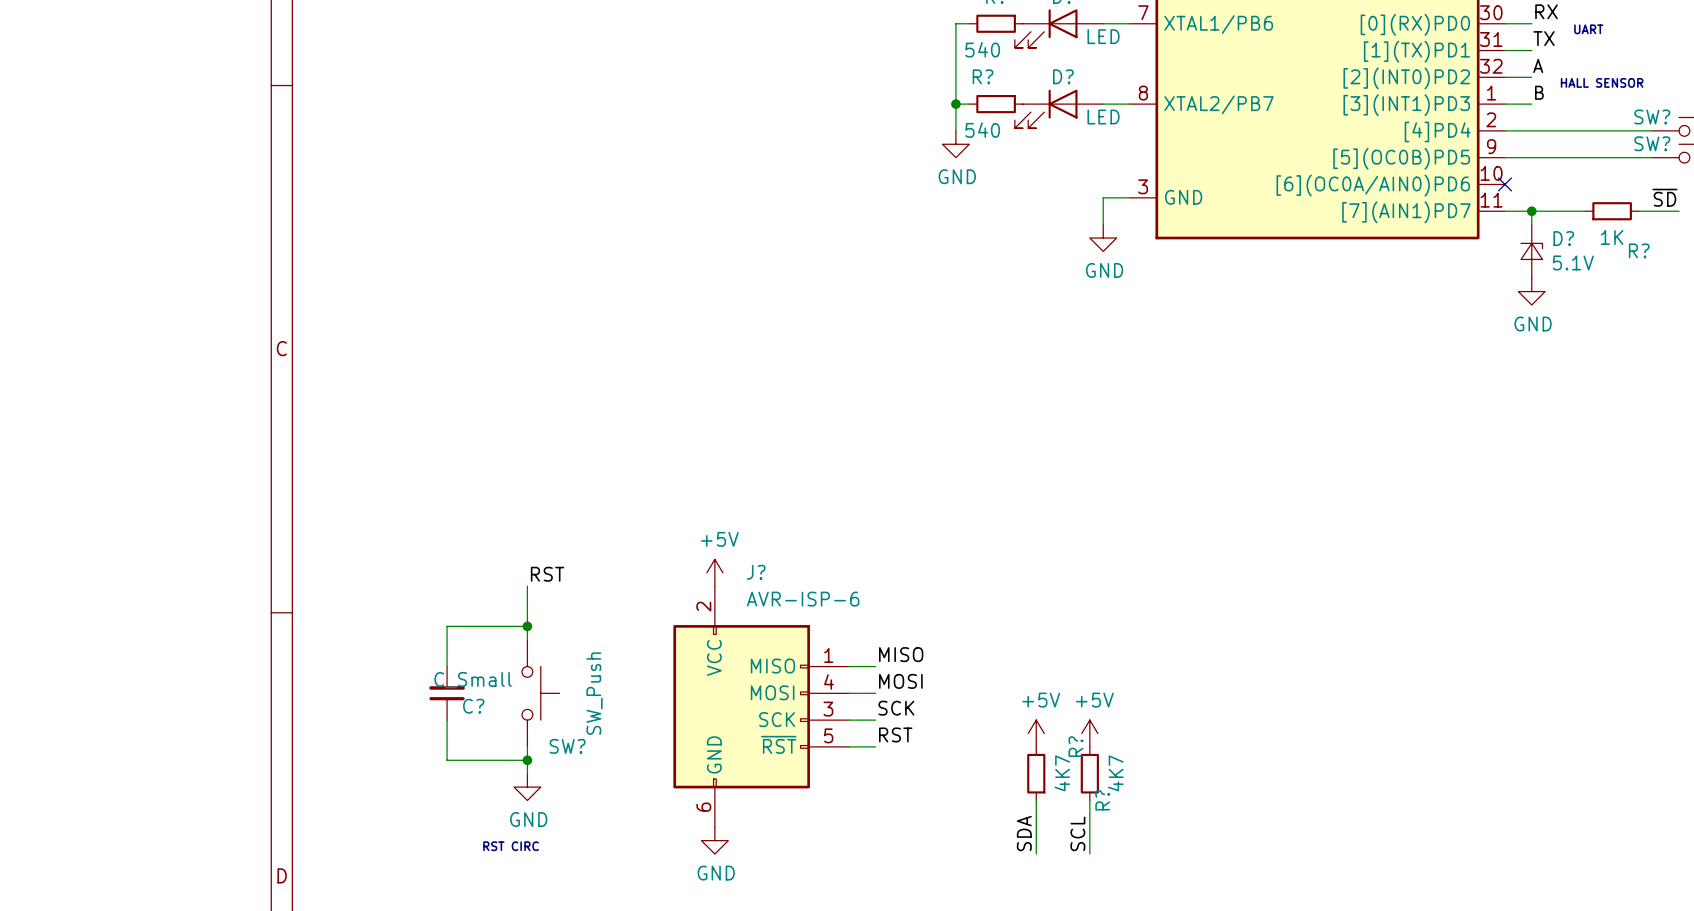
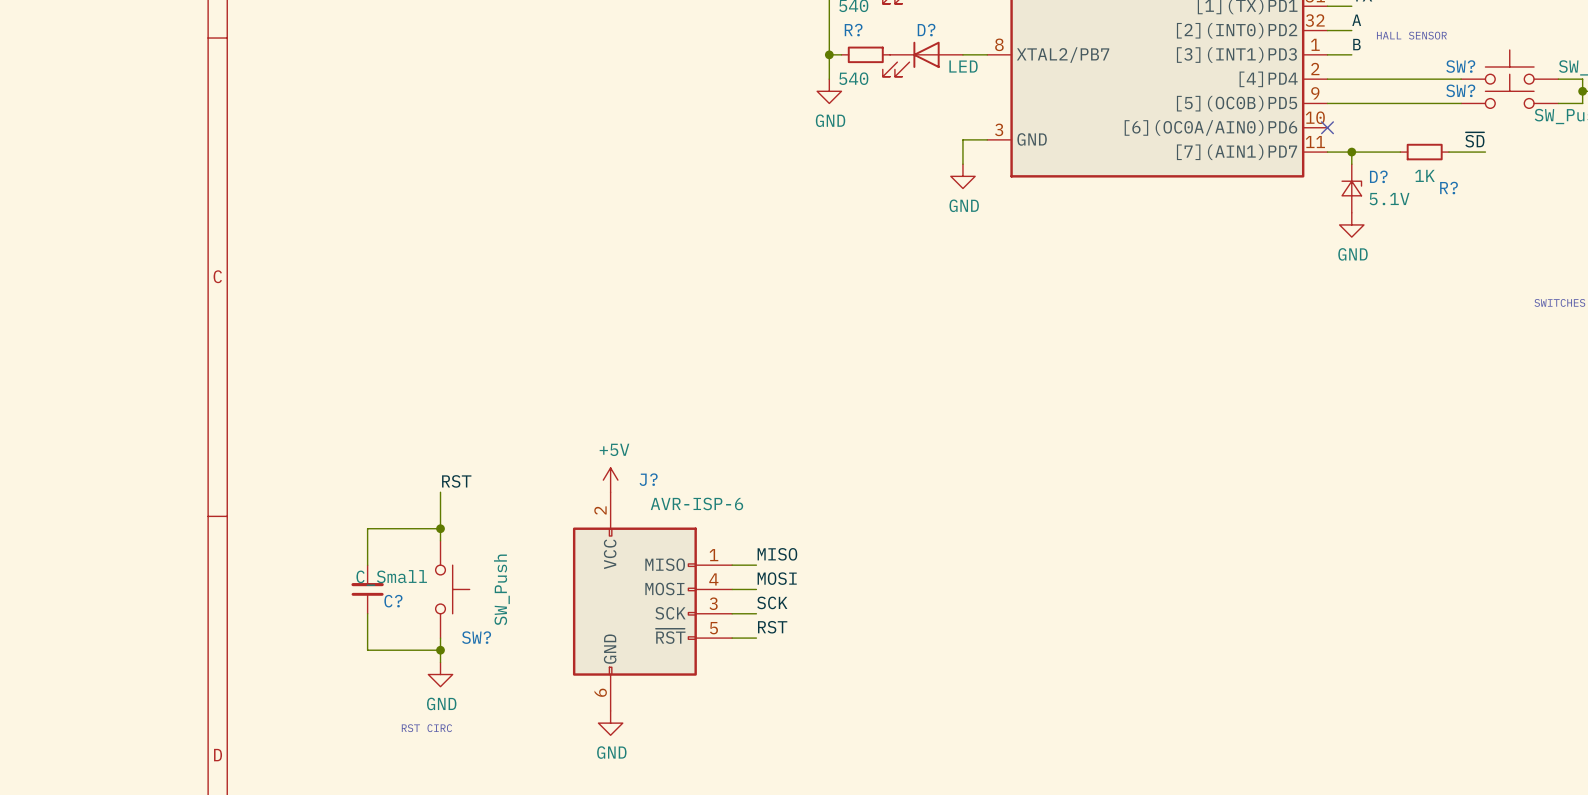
power symbol: +5V (1036, 733) -> none
power symbol: +5V (1089, 733) -> none
R?: 4K7 (1036, 773) -> none
R?: 4K7 (1089, 773) -> none
wire: (1036, 800) (1036, 854) -> none
wire: (1089, 800) (1089, 854) -> none
label: SDA (1024, 833) -> none
label: SCL (1077, 833) -> none

